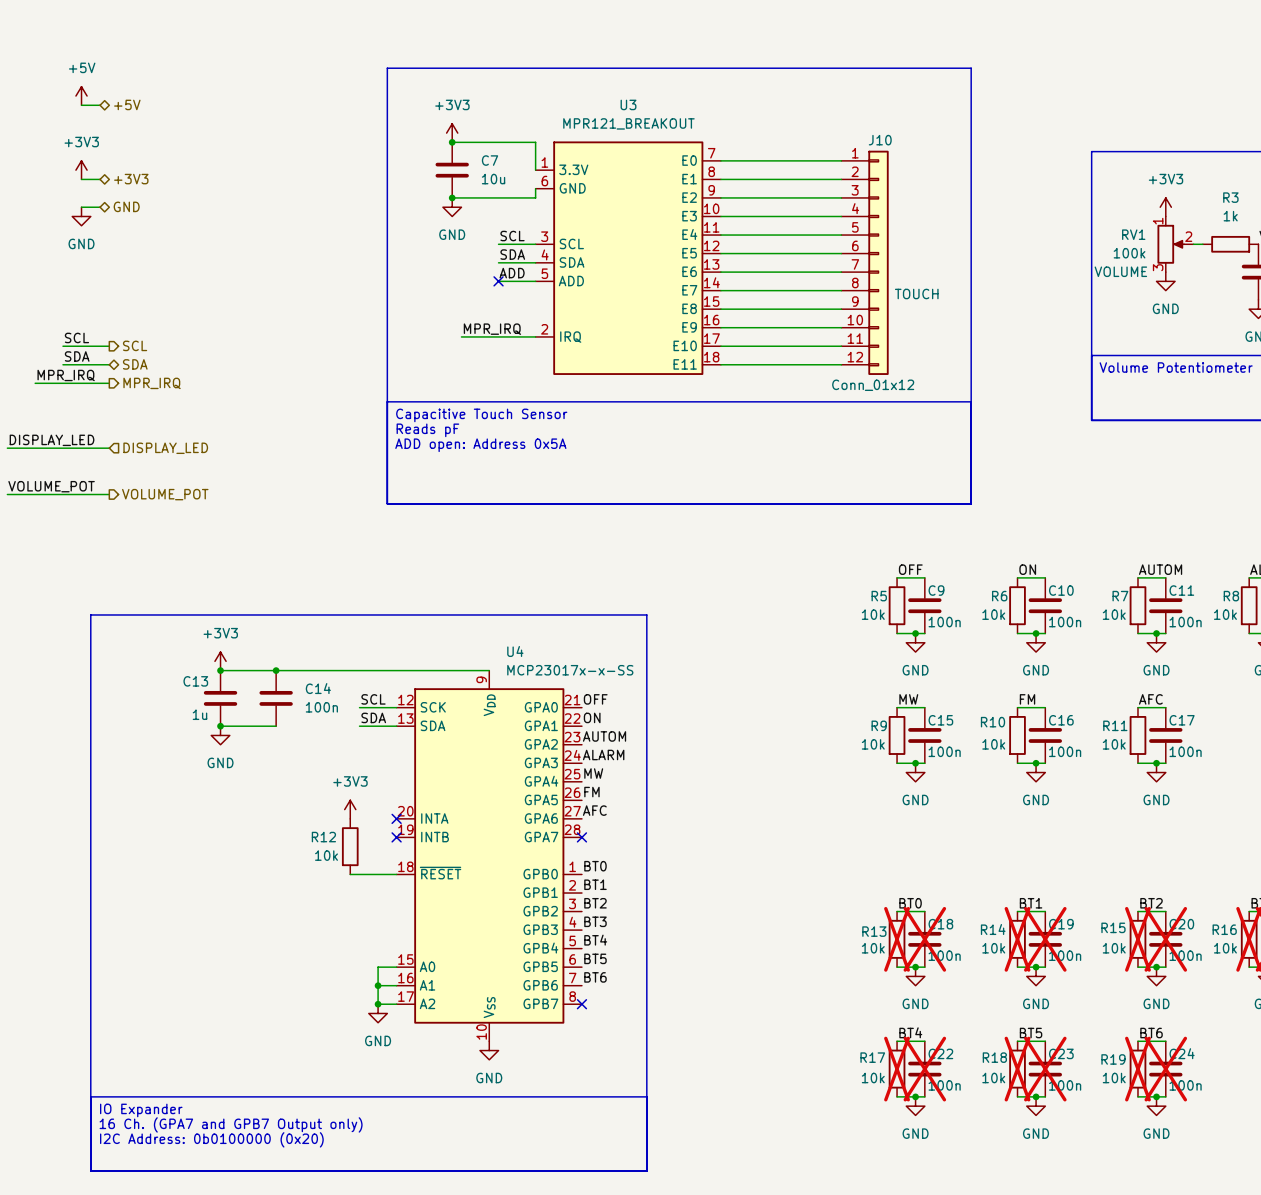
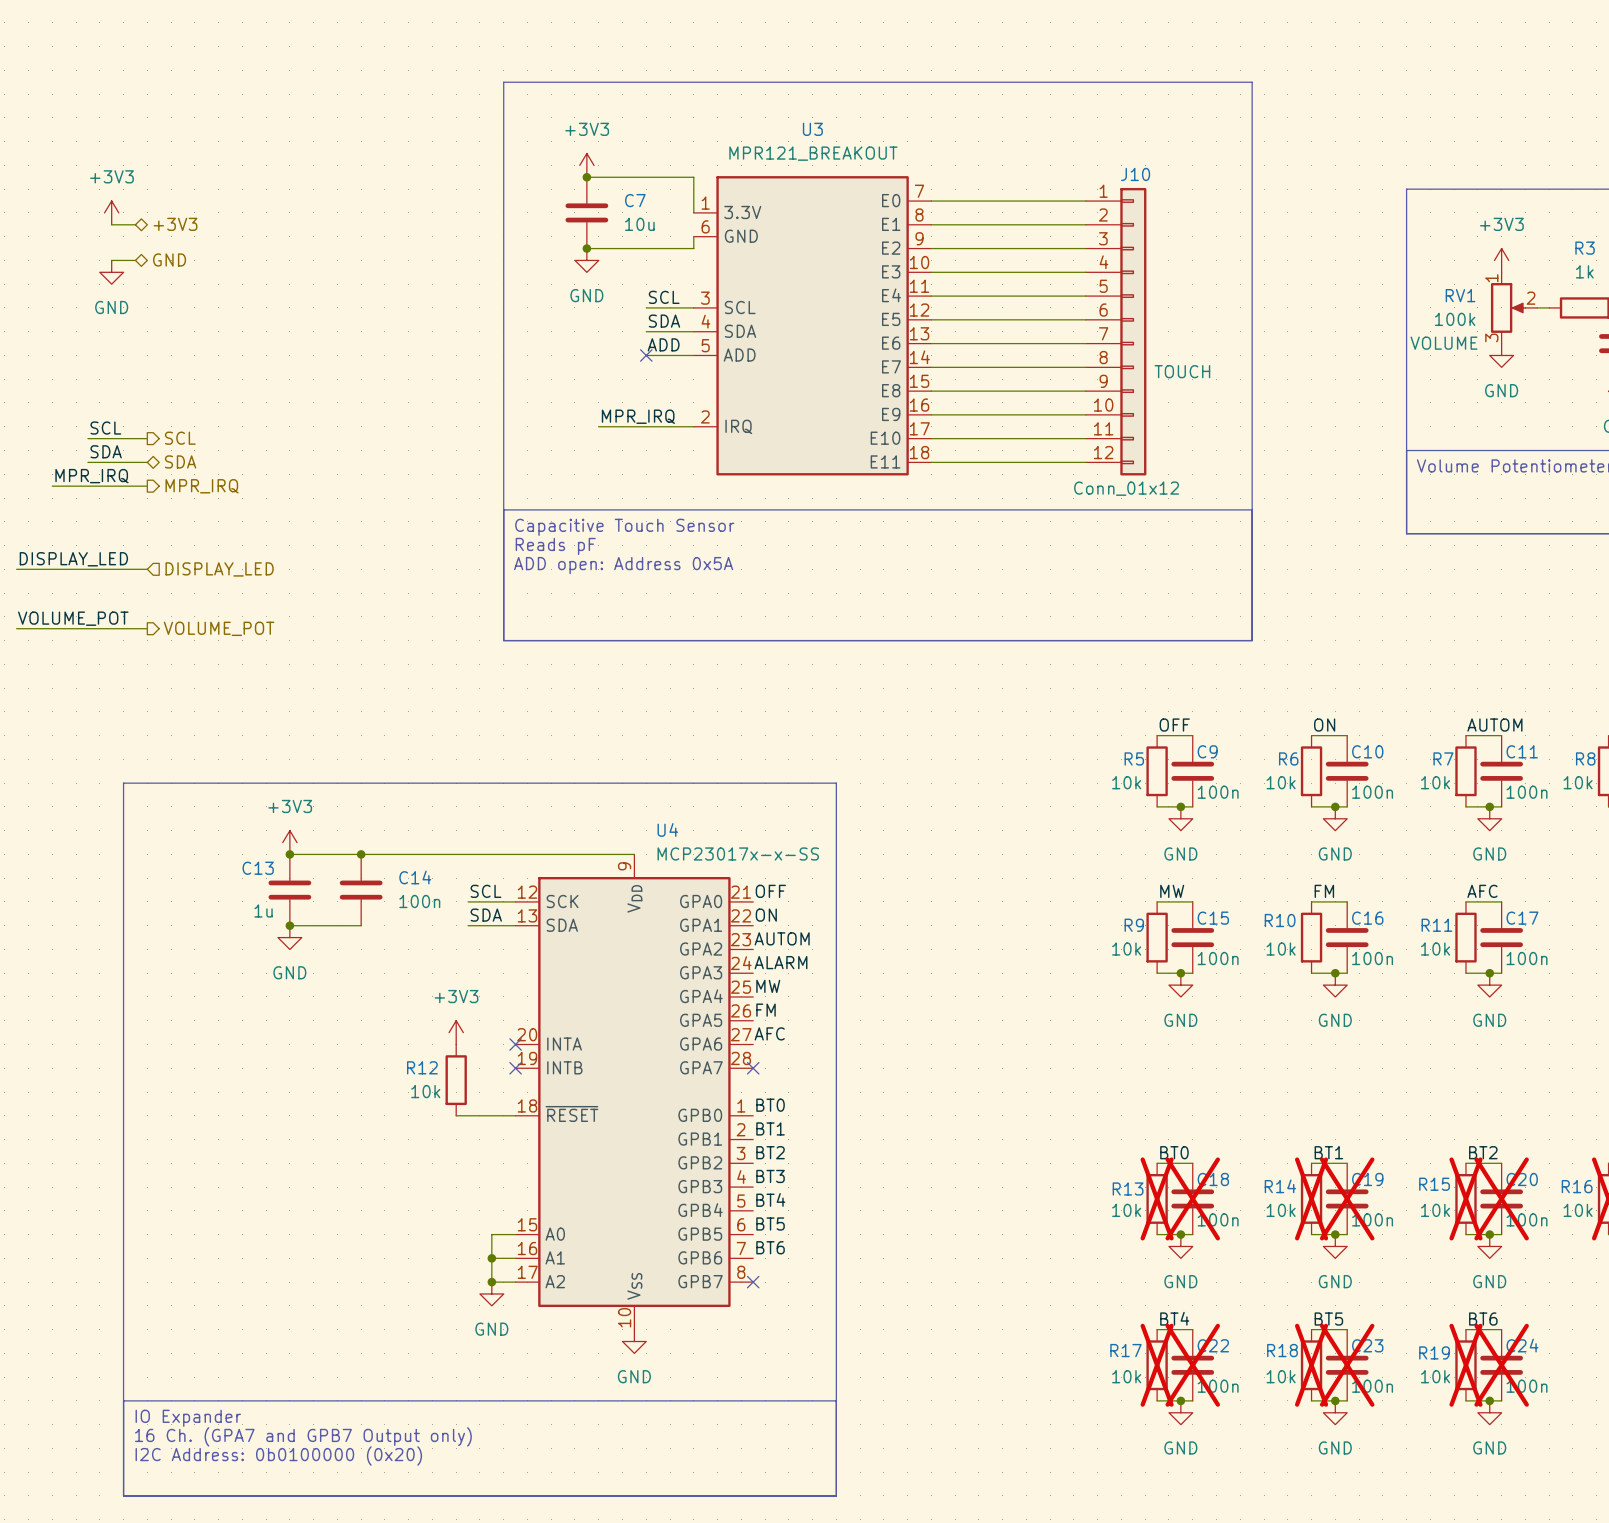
power symbol: +5V (81, 96) -> none
hierarchical label: +5V (127, 104) -> none
wire: (81, 105) (100, 105) -> none

